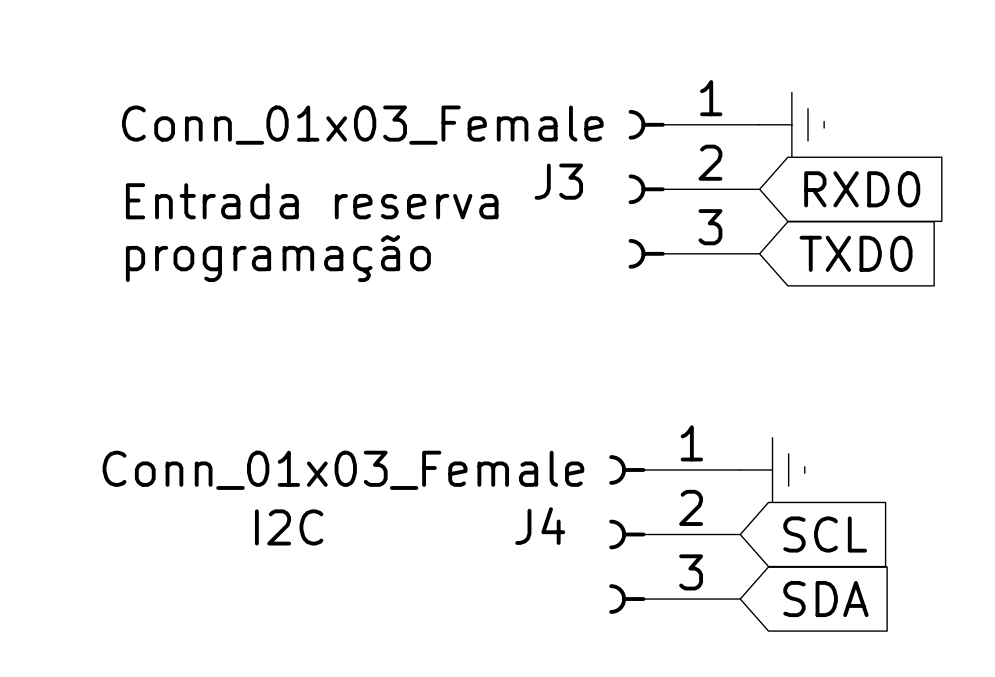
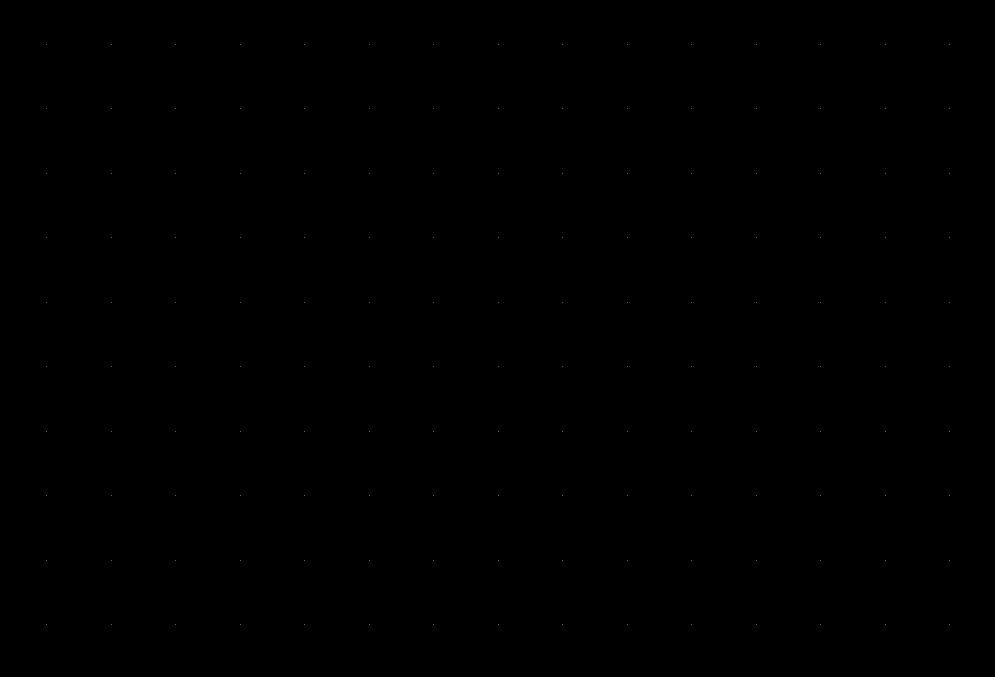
power symbol: (791, 124) -> none
J3: Conn_01x03_Female (694, 189) -> none
global label: RXD0 (862, 189) -> none
text: Entrada reserva (312, 201) -> none
global label: TXD0 (856, 253) -> none
text: programação (278, 258) -> none
power symbol: (772, 469) -> none
text: I2C (289, 527) -> none
J4: Conn_01x03_Female (674, 534) -> none
global label: SCL (825, 534) -> none
global label: SDA (825, 599) -> none

